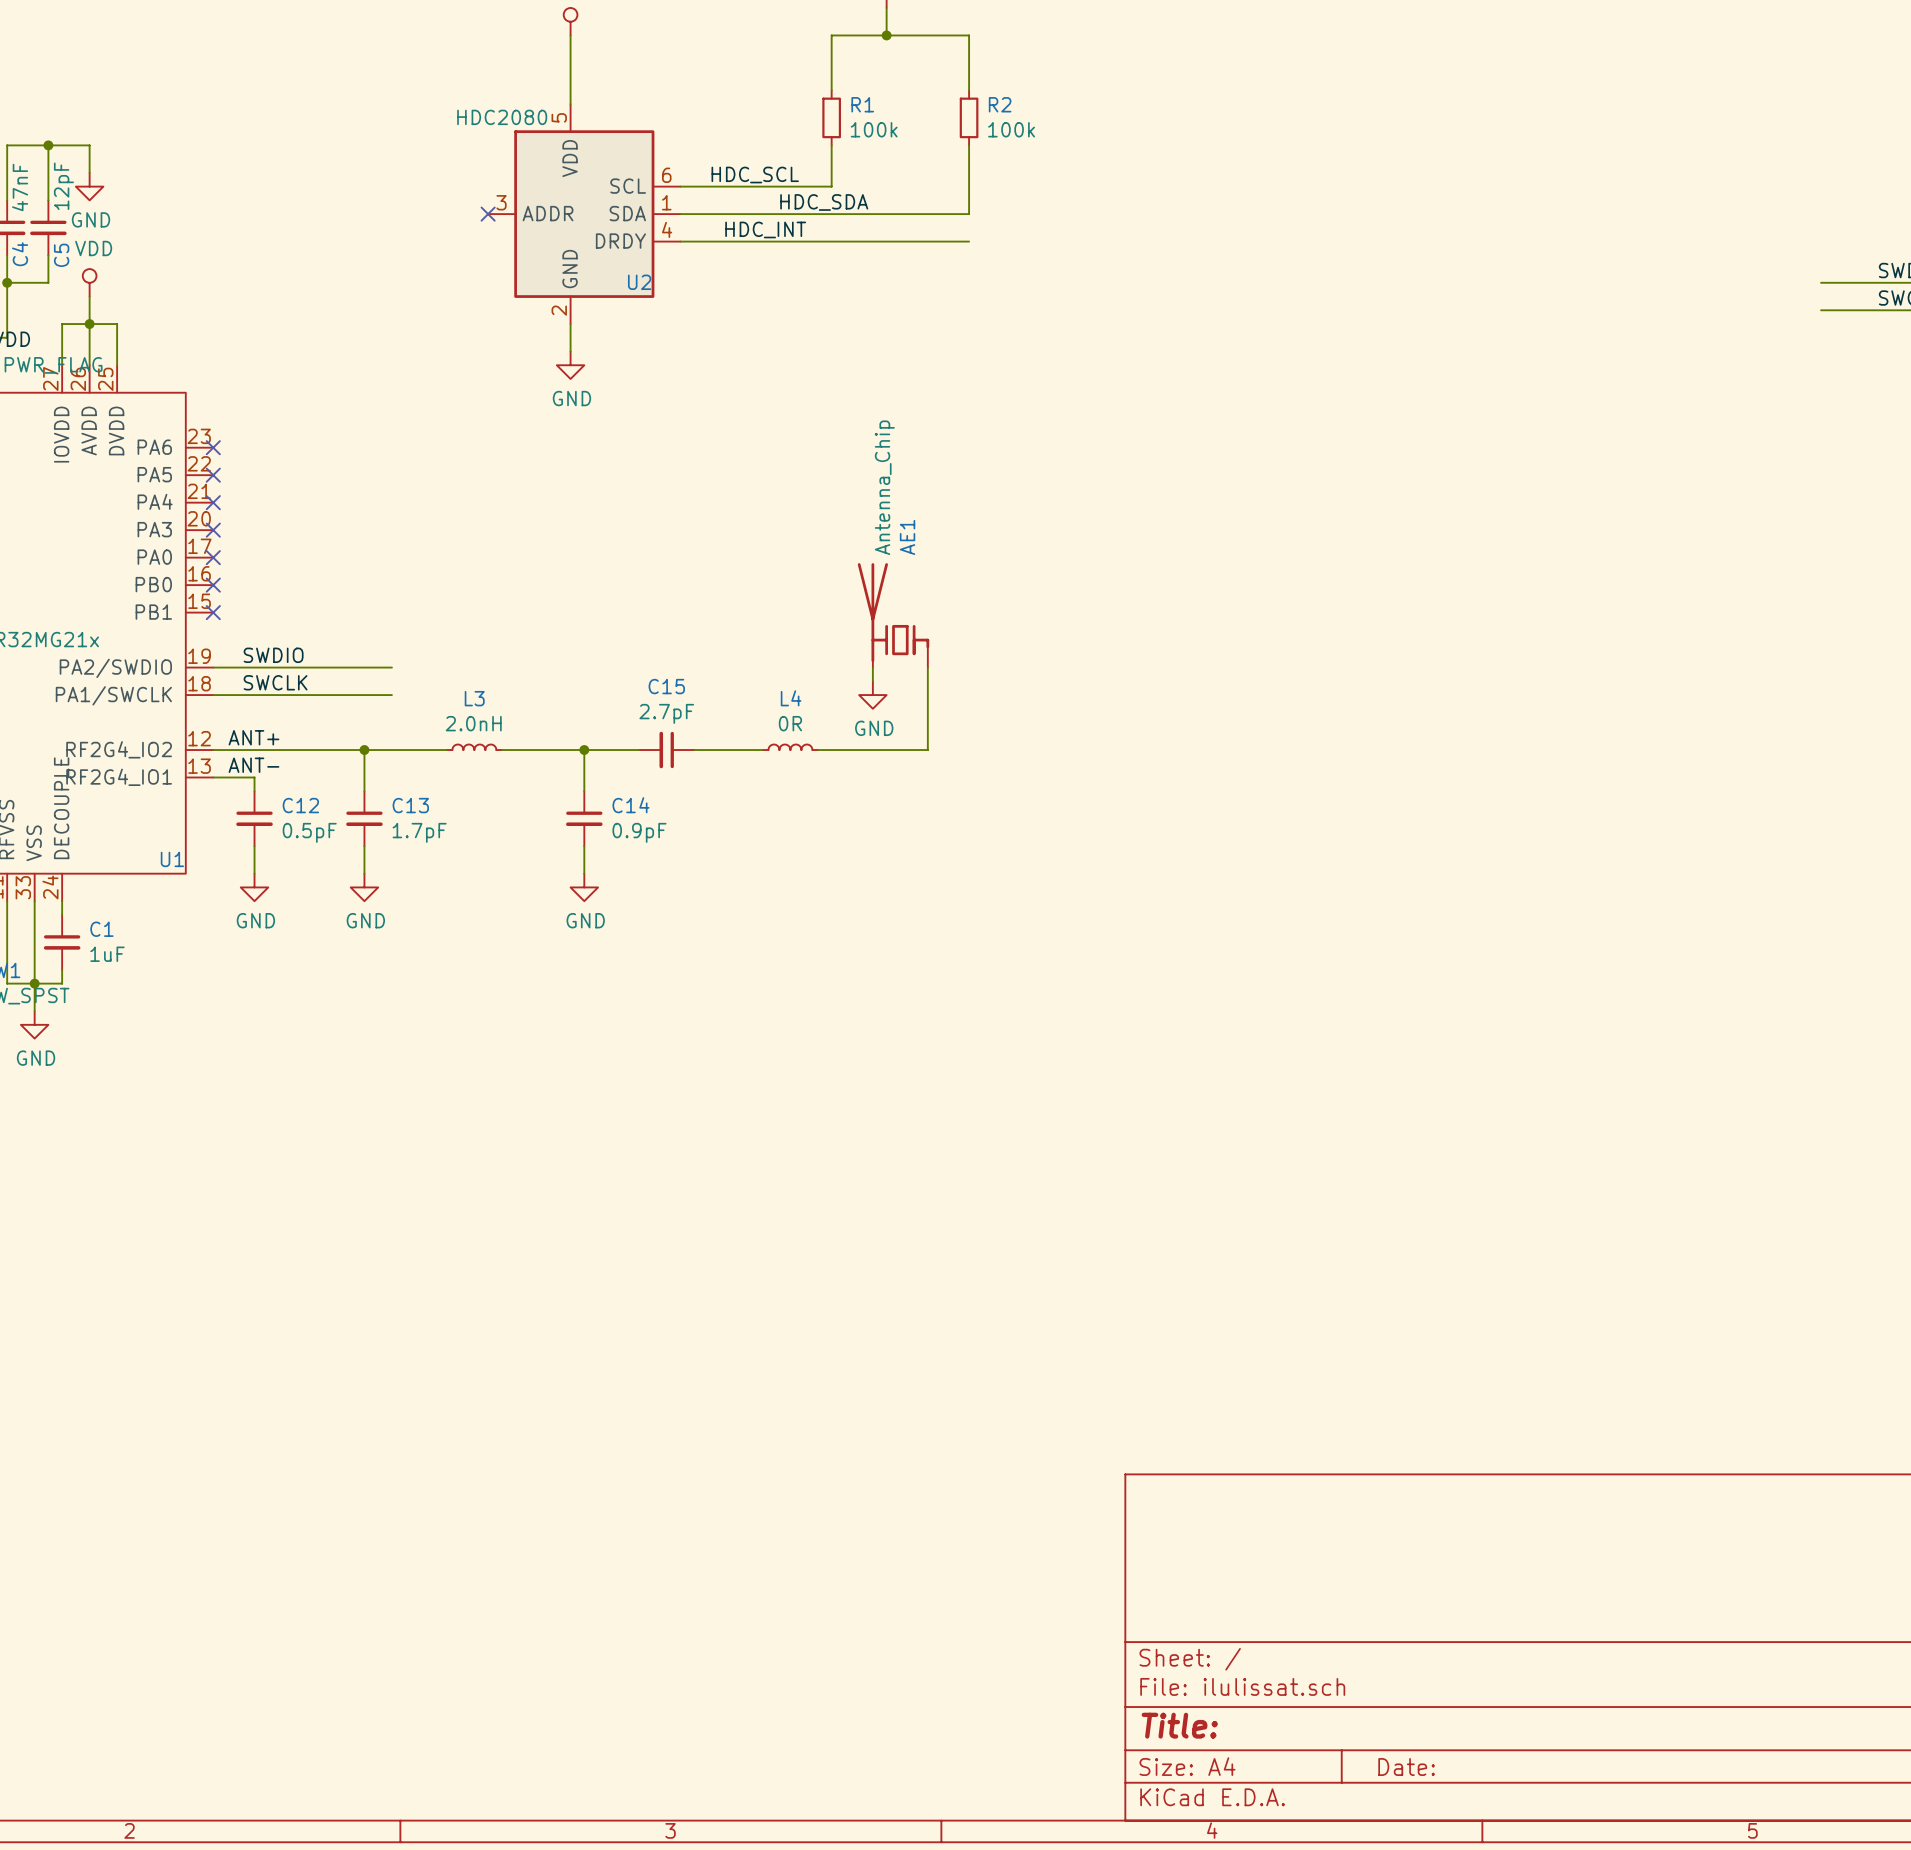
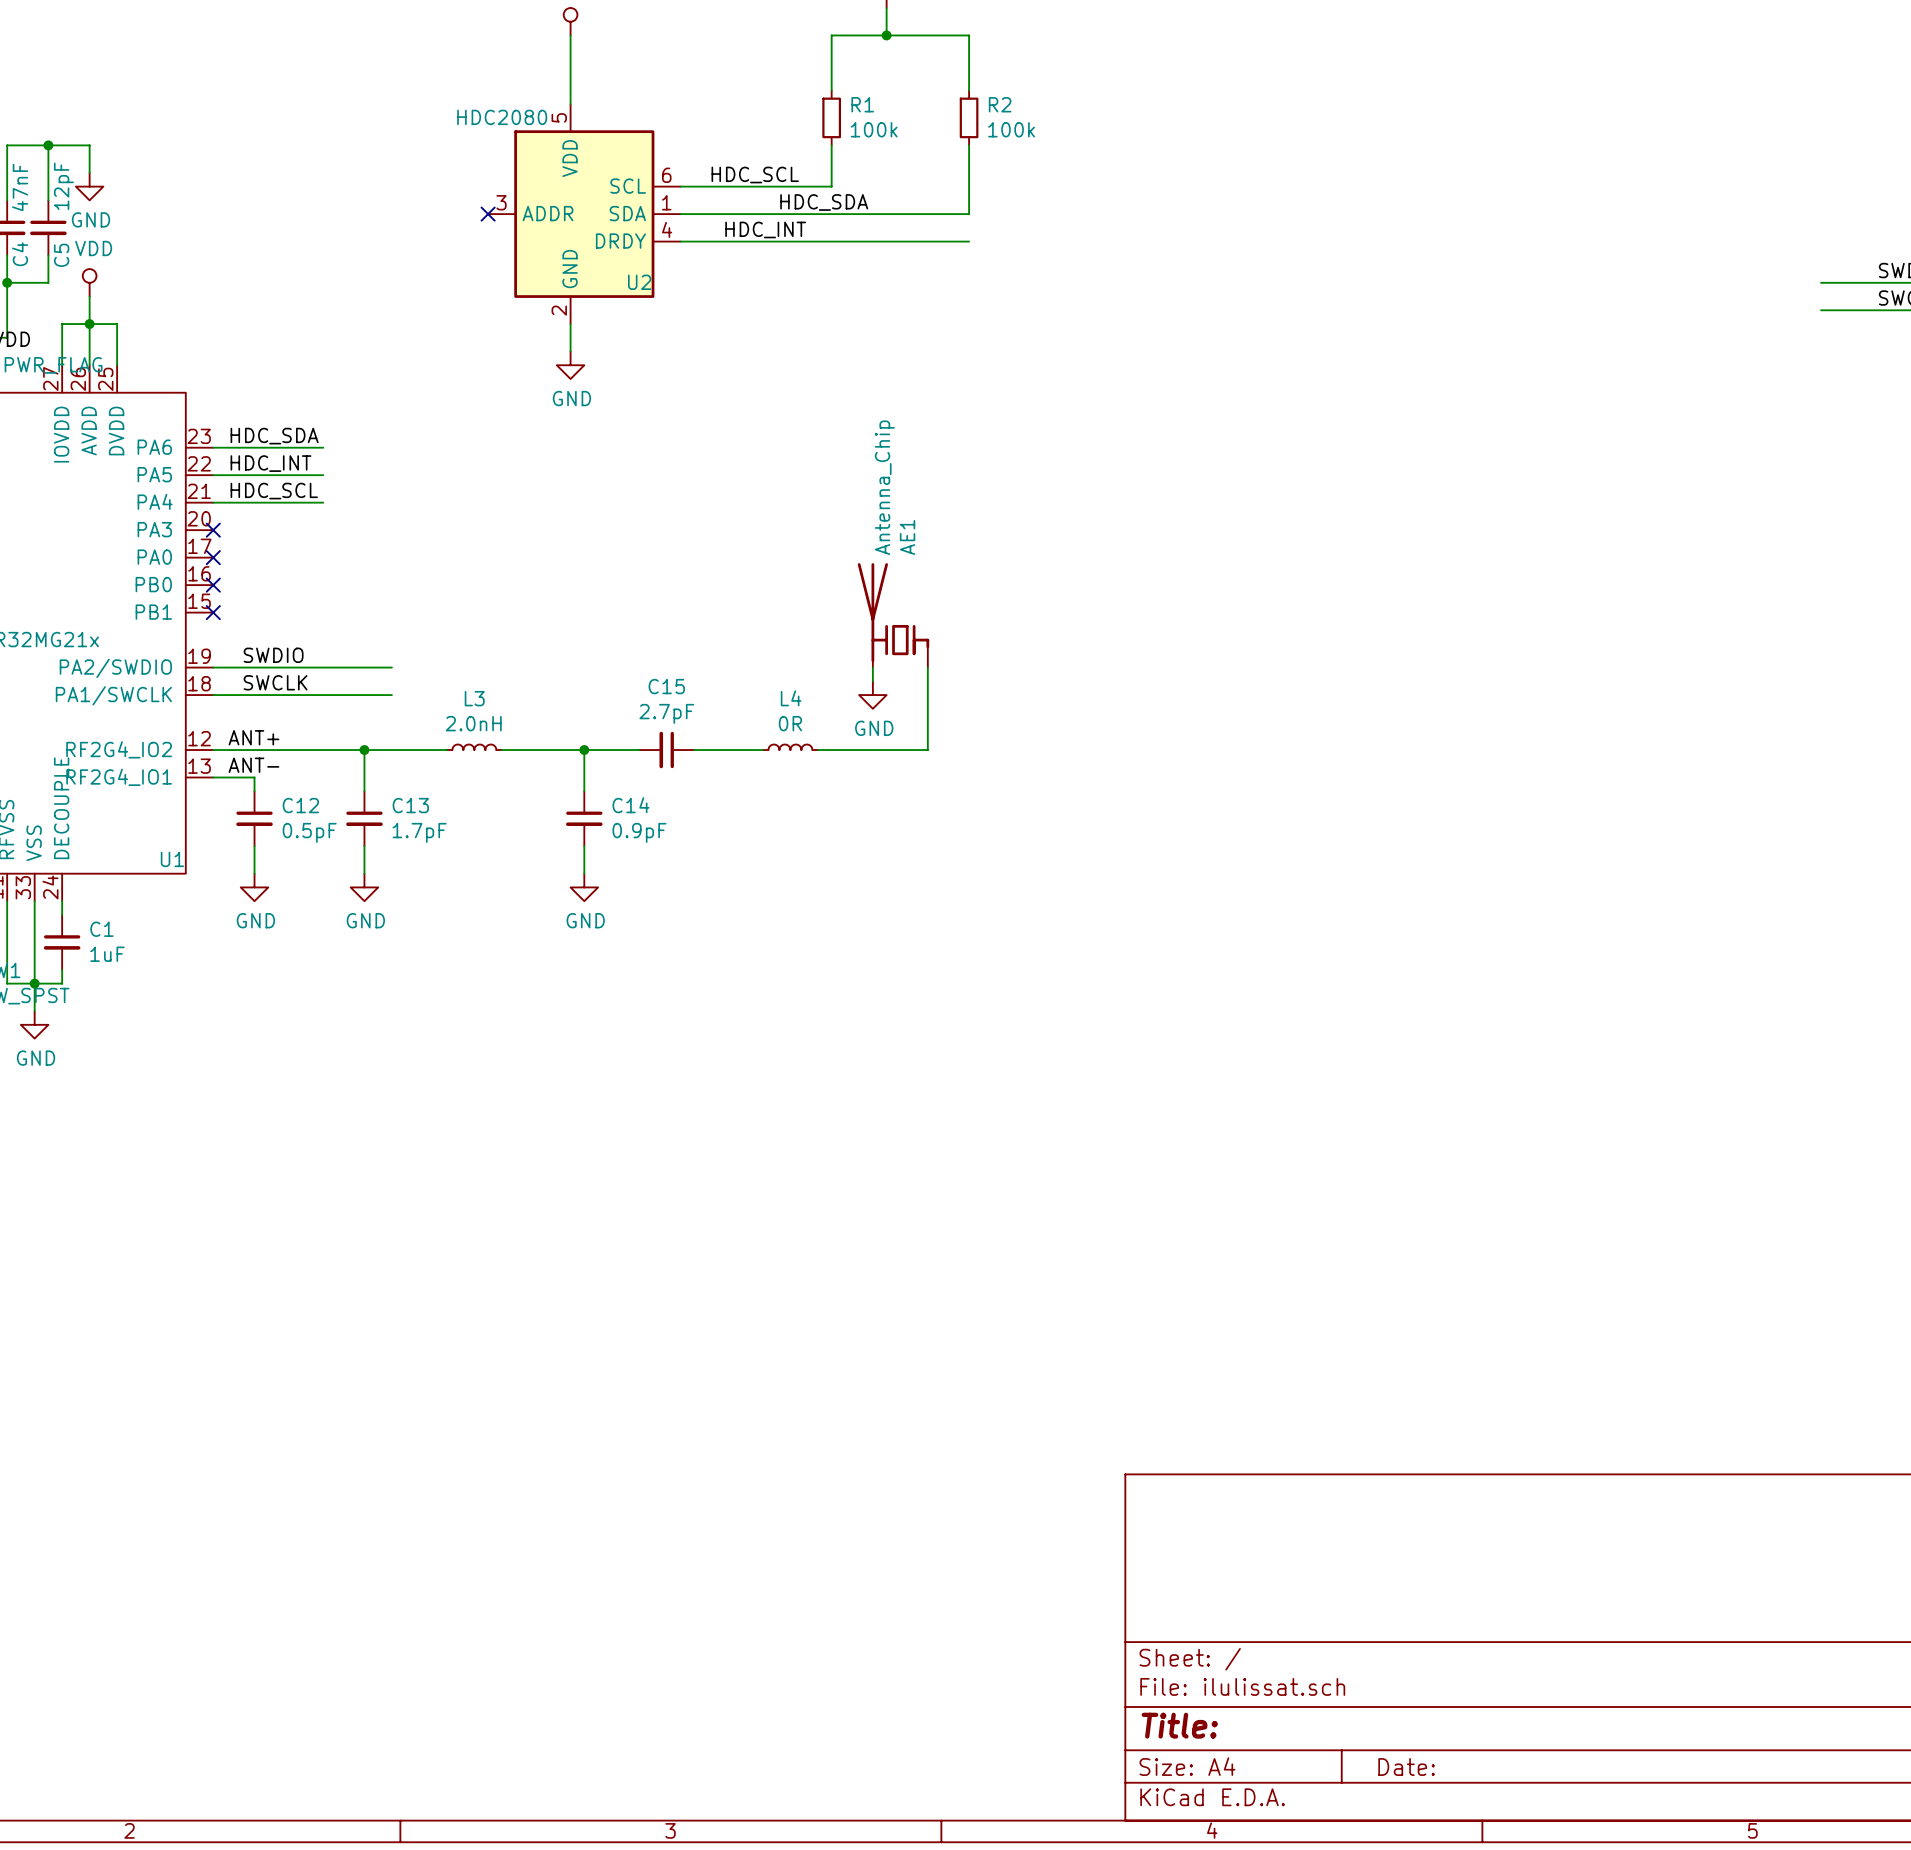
label: none -> HDC_SDA (274, 436)
wire: none -> (213, 447) (323, 447)
no-connect mark: (213, 447) -> none
label: none -> HDC_INT (270, 463)
wire: none -> (213, 475) (323, 475)
no-connect mark: (213, 475) -> none
label: none -> HDC_SCL (274, 491)
wire: none -> (213, 502) (323, 502)
no-connect mark: (213, 502) -> none

